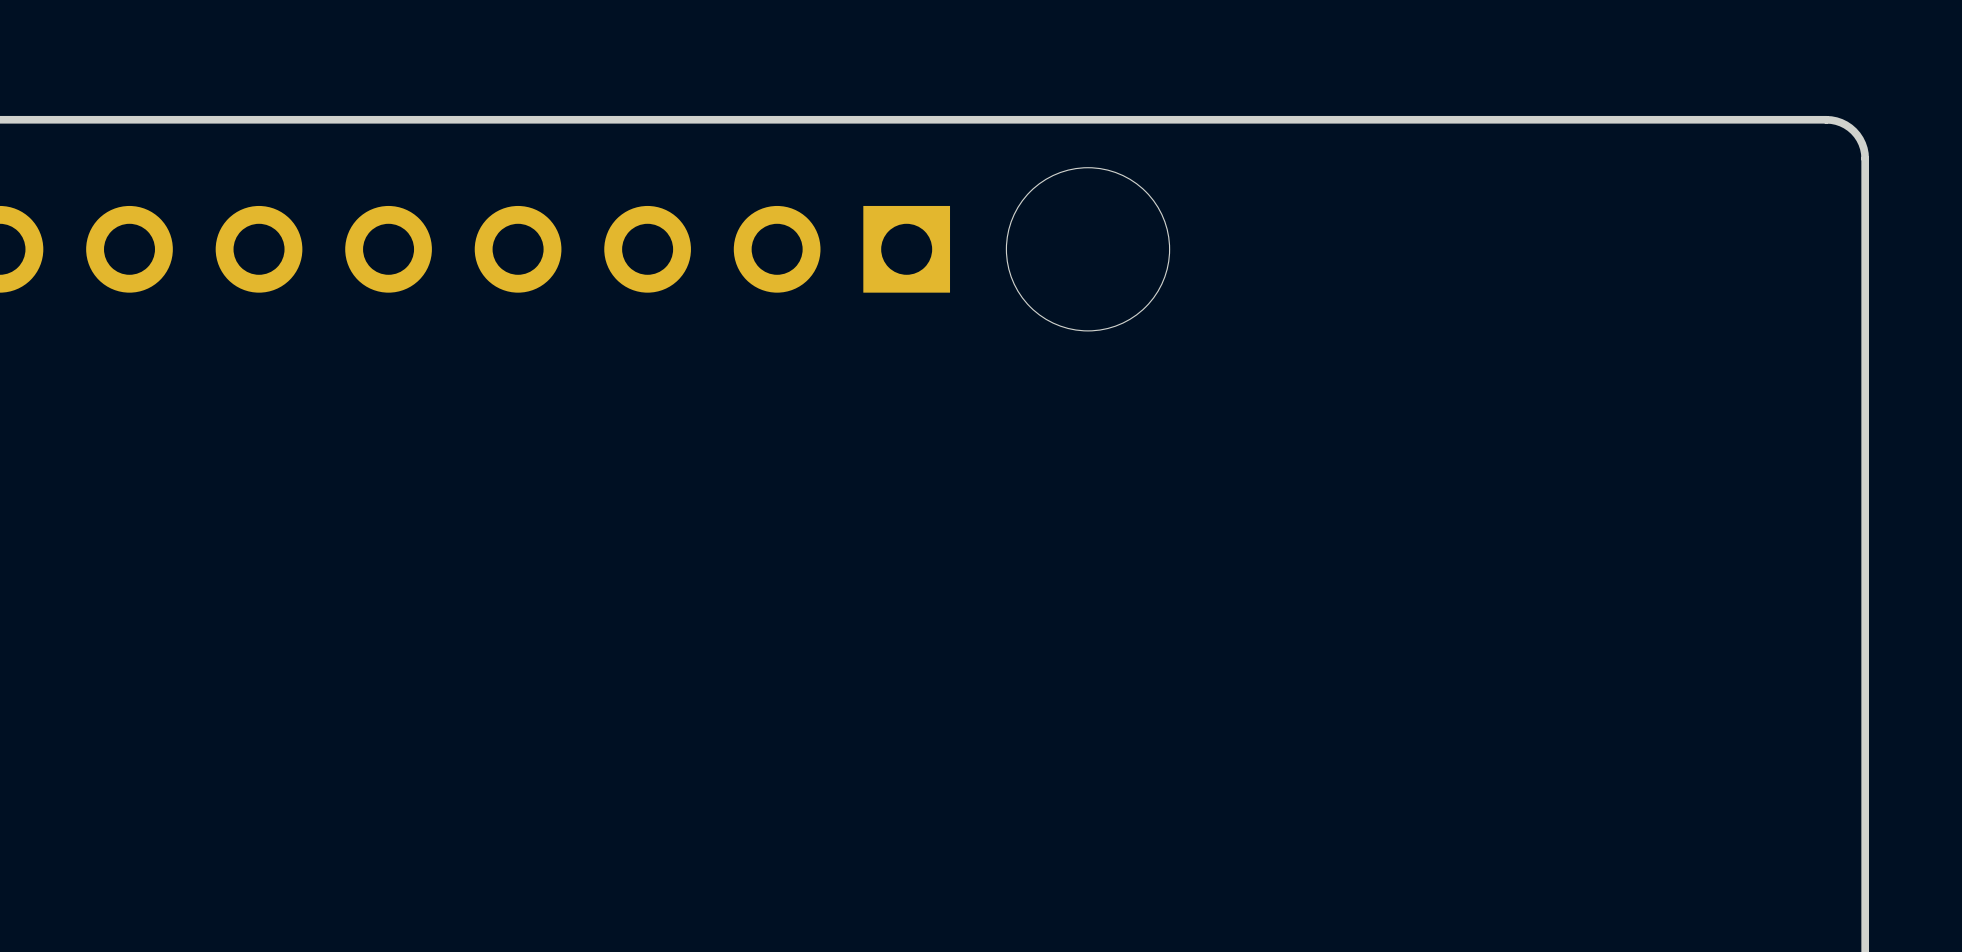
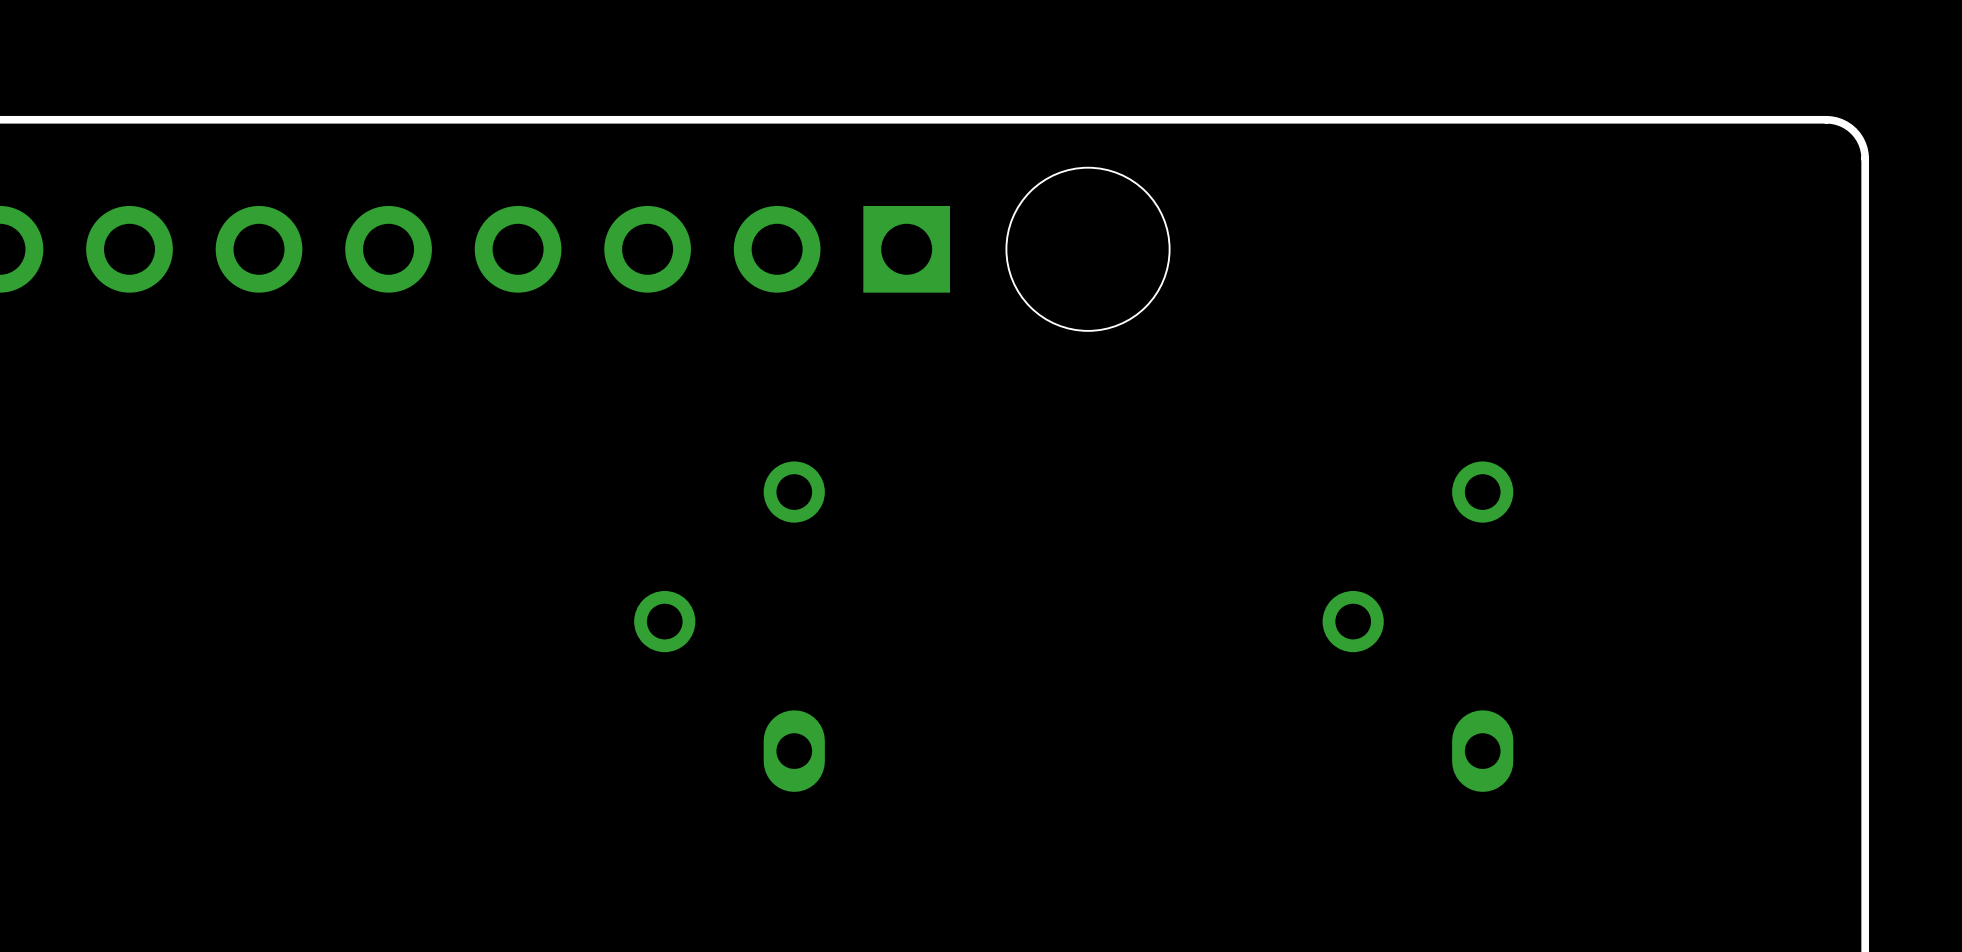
part: none -> (729, 626)
part: none -> (1417, 626)

